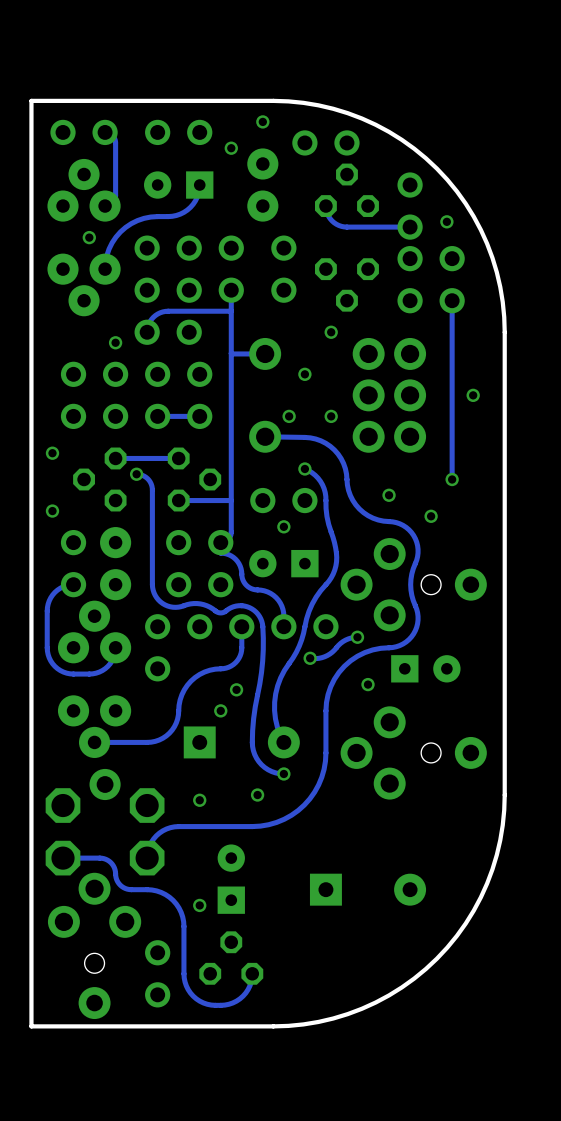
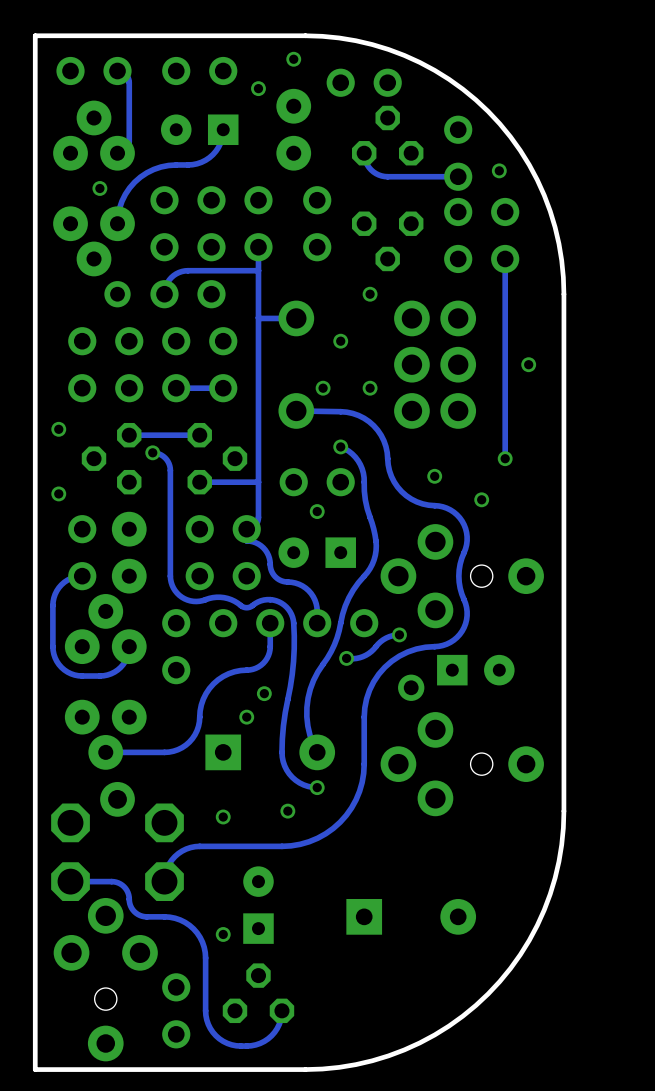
part: none -> (117, 294)
via: (115, 342) -> none
via: (368, 684) -> none
part: none -> (411, 687)

